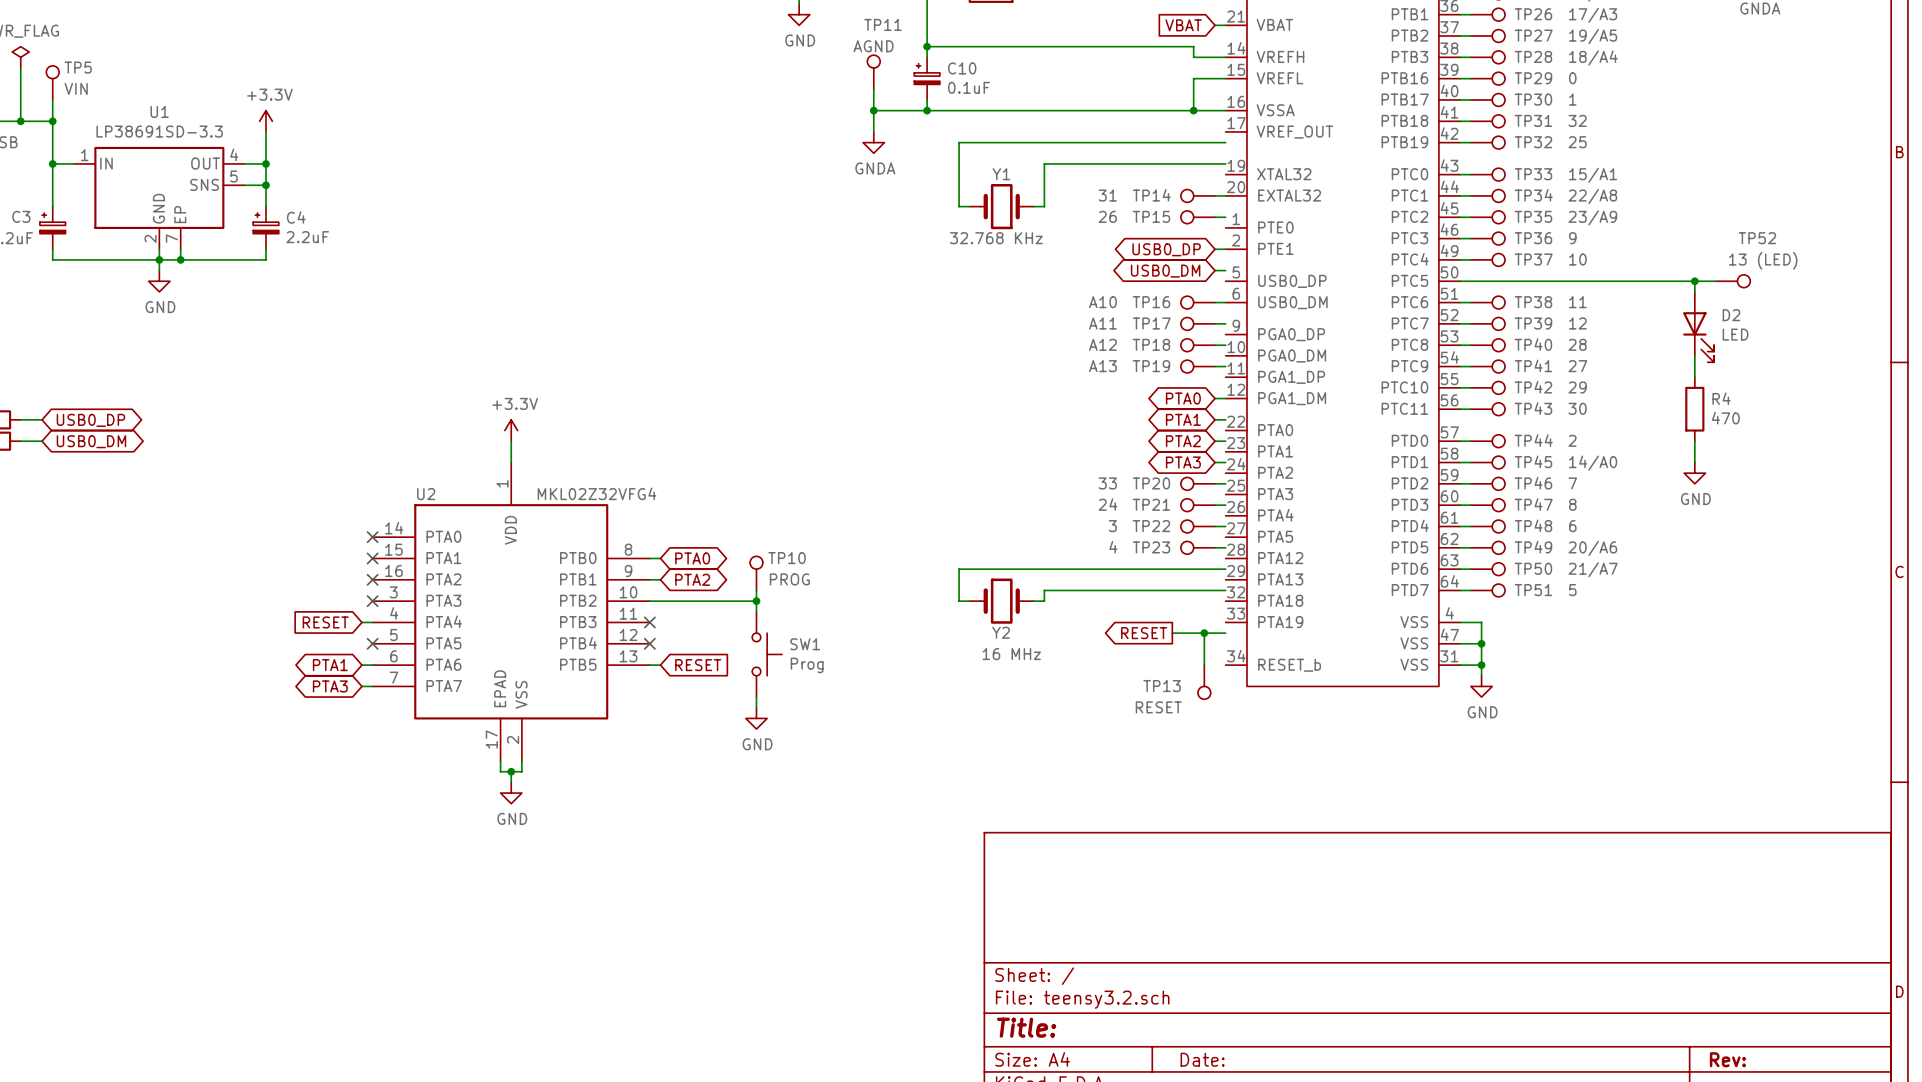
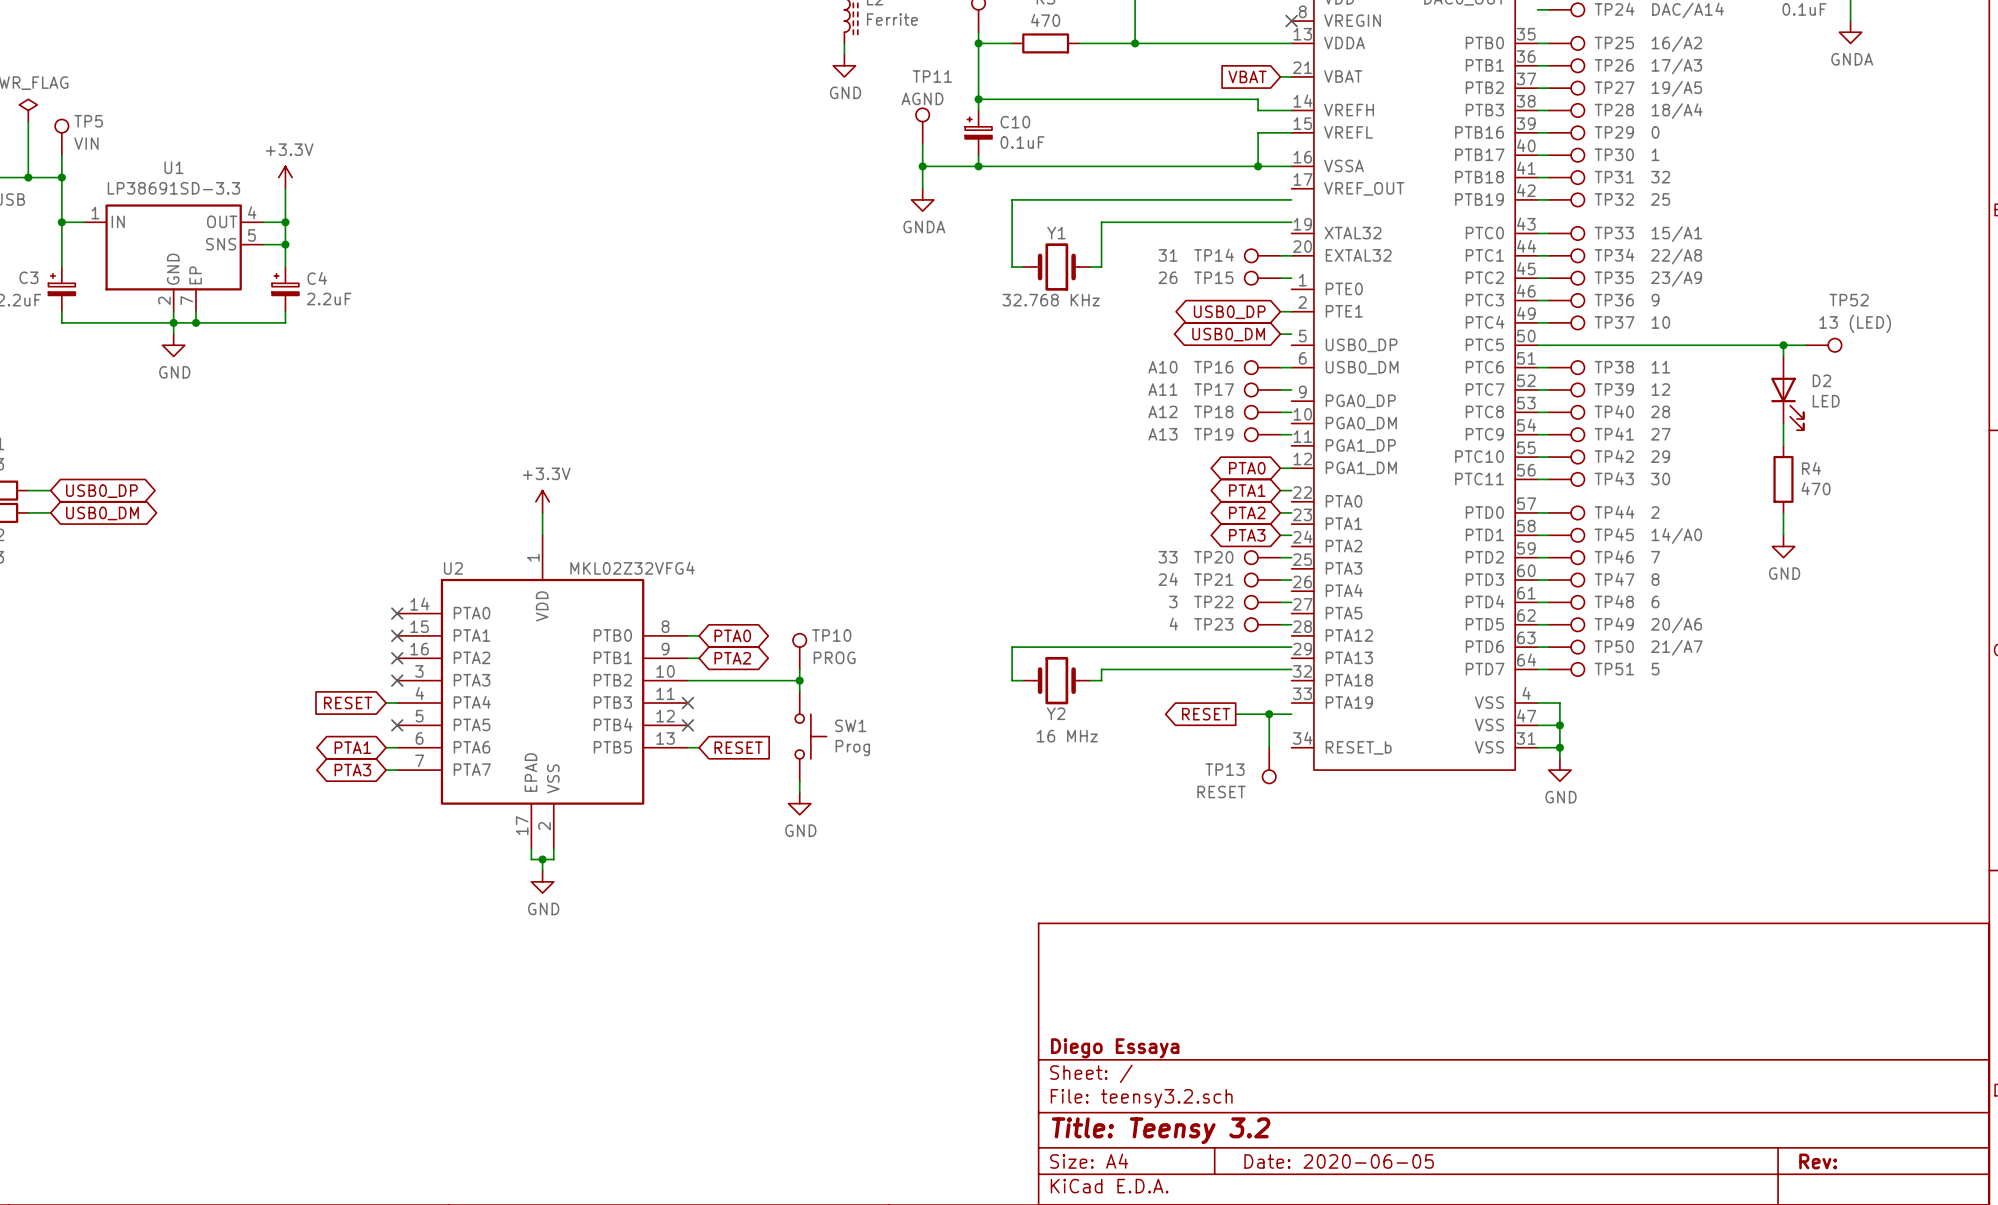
title block: none -> Diego Essaya (1115, 1048)
title block: Title: (1026, 1027) -> Title: Teensy 3.2 (1161, 1130)
title block: Date: (1202, 1059) -> Date: 2020-06-05 (1339, 1161)

